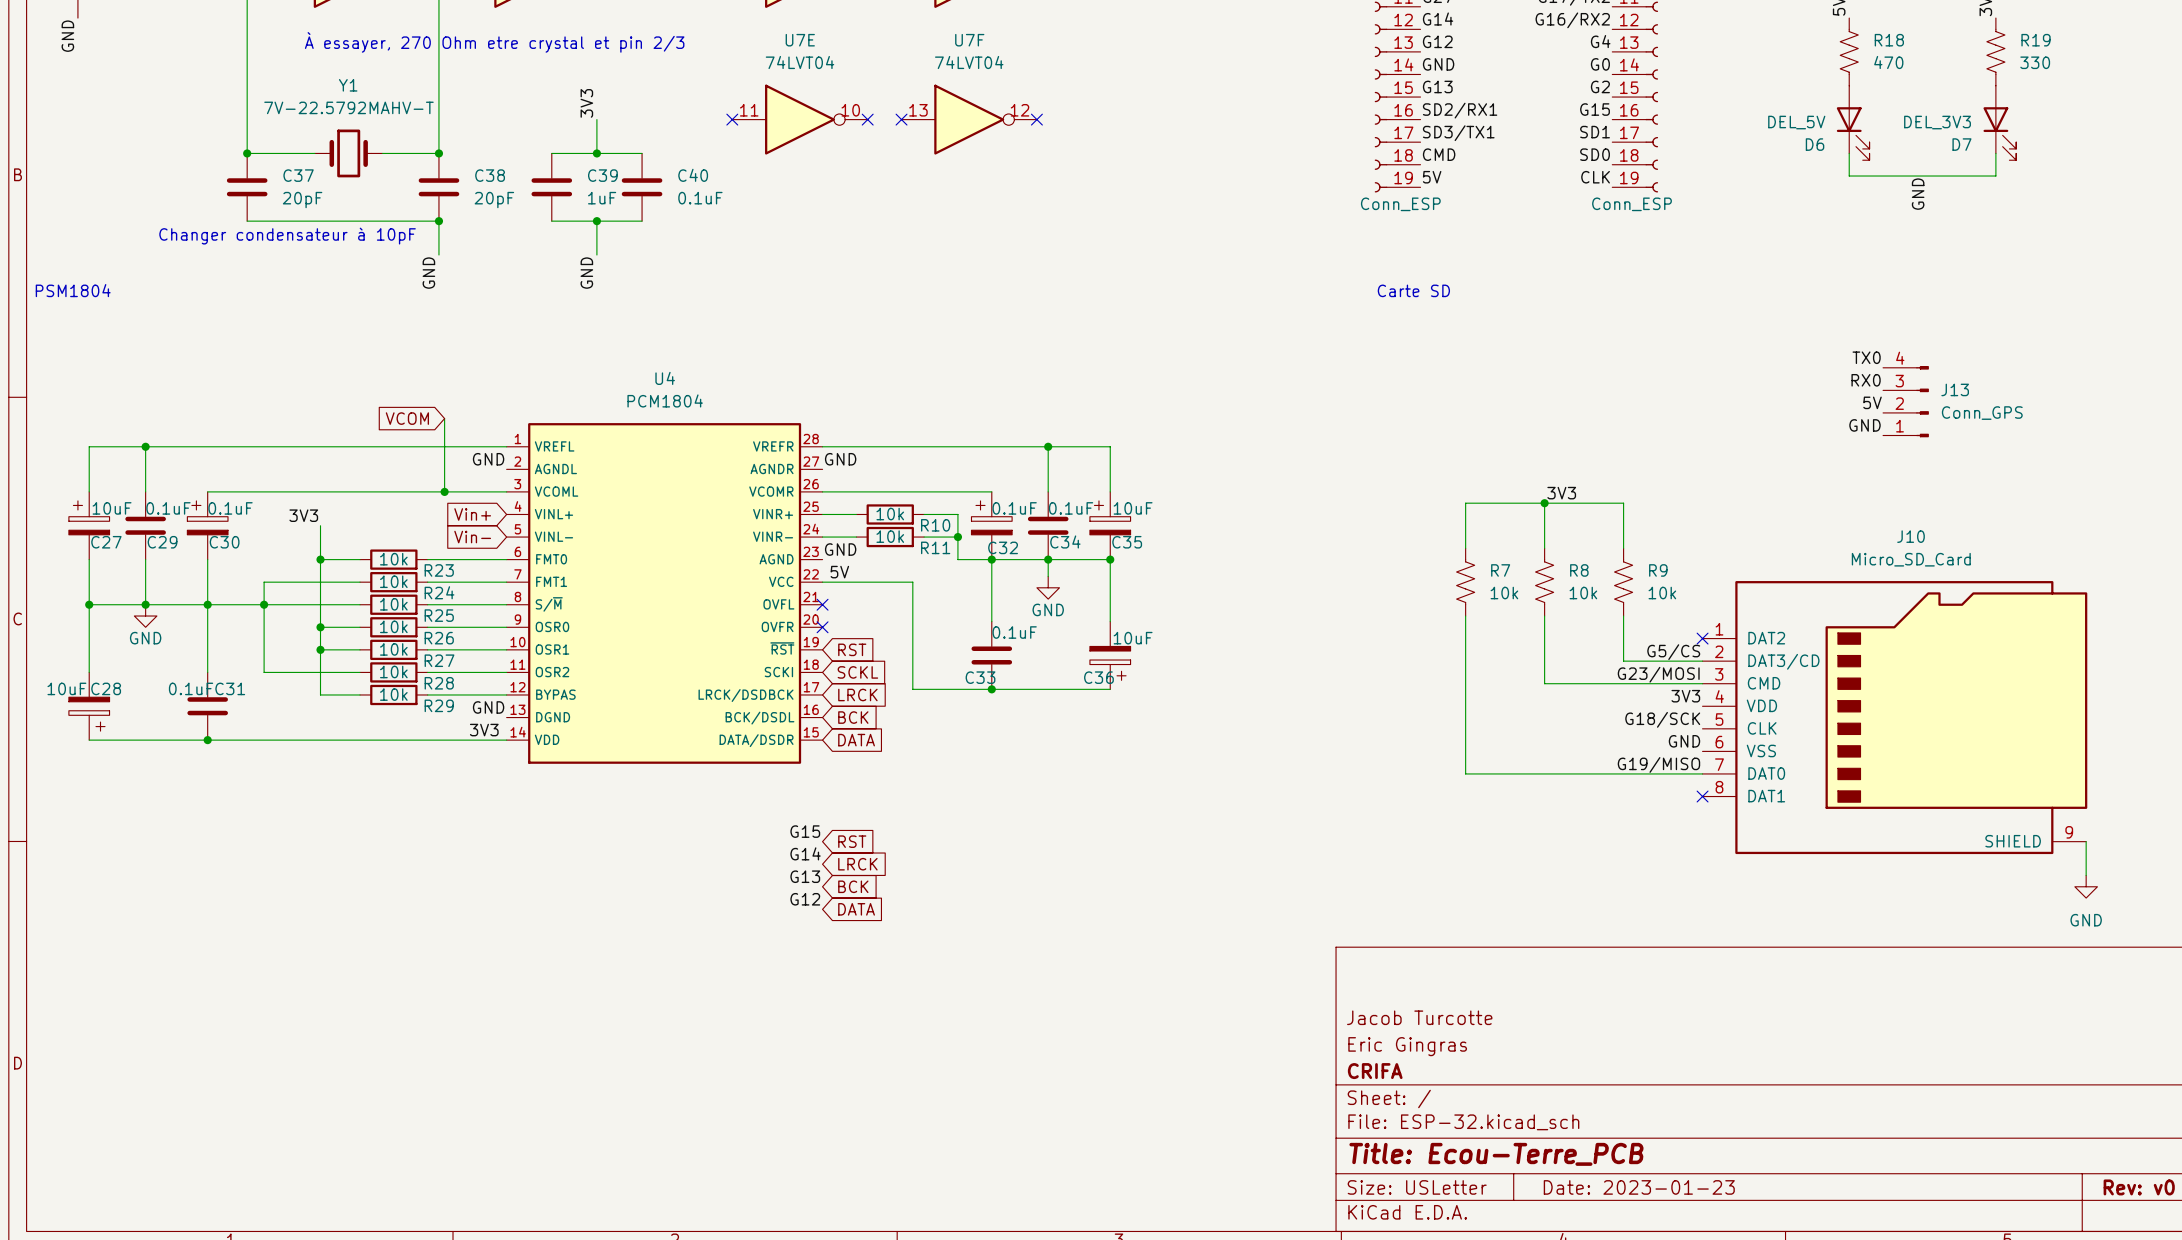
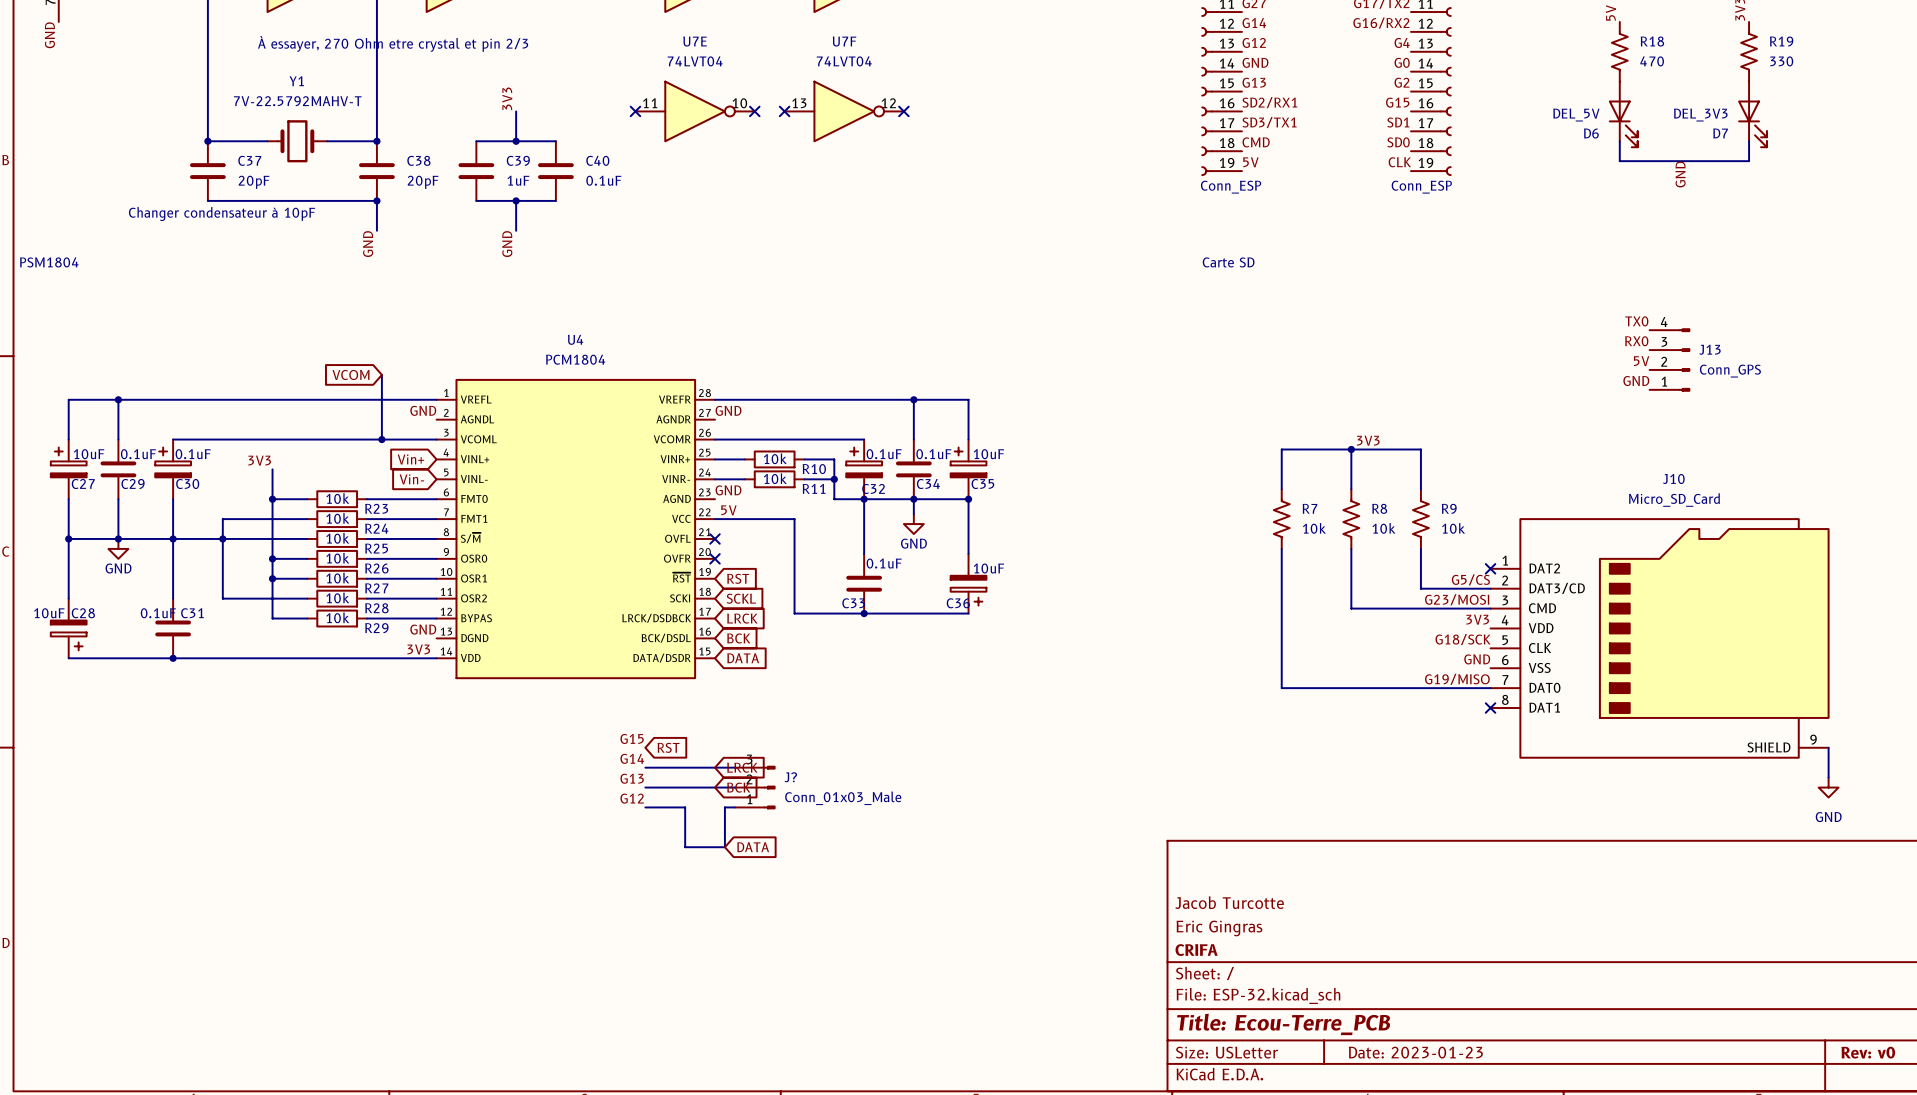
label position: G15 (805, 831) -> G15 (632, 738)
global label position: RST (852, 841) -> RST (668, 747)
label position: G14 (805, 853) -> G14 (632, 758)
wire: none -> (645, 767) (734, 767)
label position: G13 (805, 876) -> G13 (632, 778)
wire: none -> (645, 787) (734, 787)
J?: none -> Conn_01x03_Male (755, 787)
label position: G12 (805, 899) -> G12 (632, 798)
wire: none -> (645, 807) (685, 807) (685, 847) (724, 847) (724, 807) (734, 807)
global label position: DATA (856, 909) -> DATA (753, 847)

